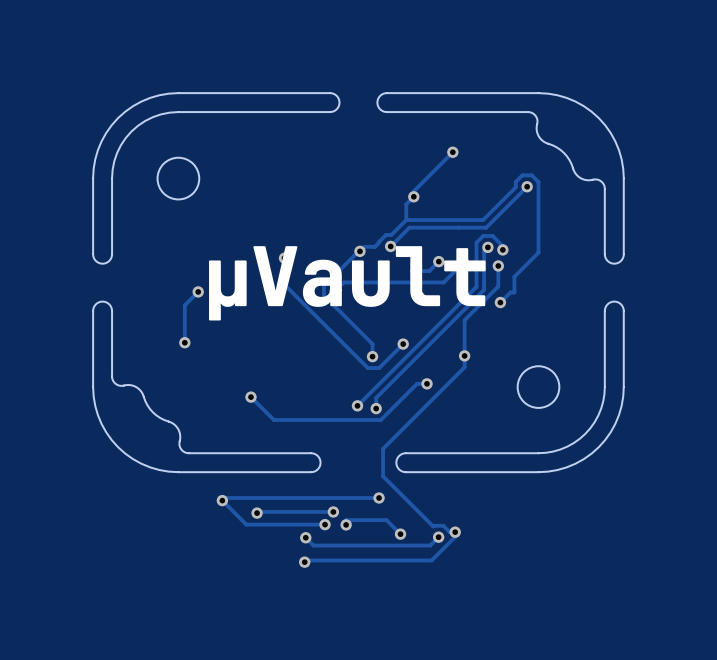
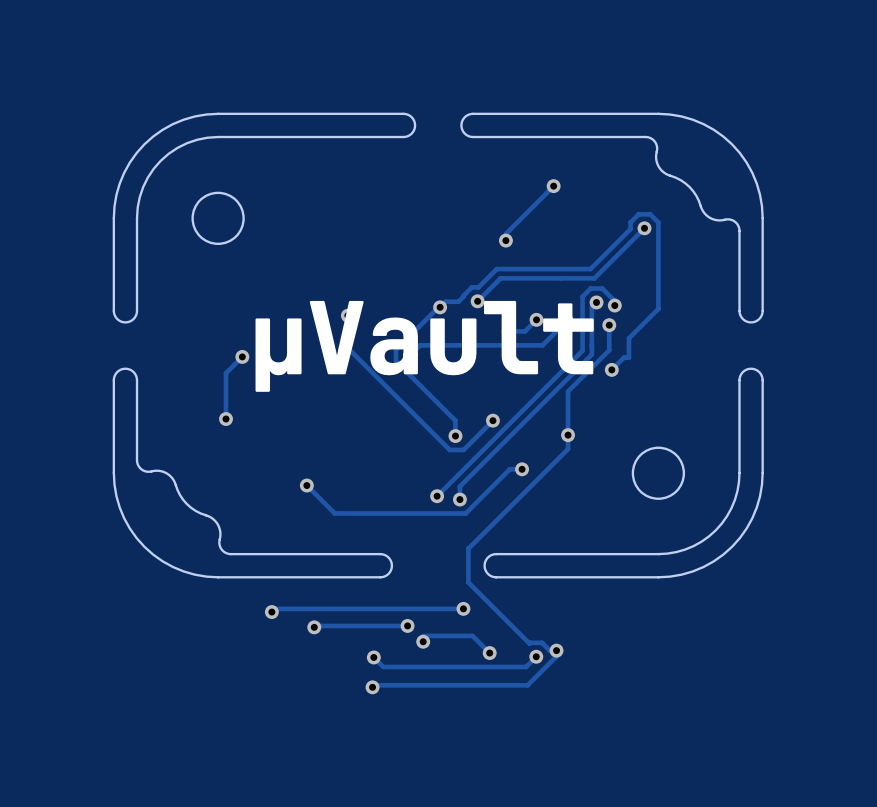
track: (413, 196) (406, 204) (406, 220) -> none
track: (222, 500) (246, 524) (325, 524) -> none
via: (325, 524) -> none

